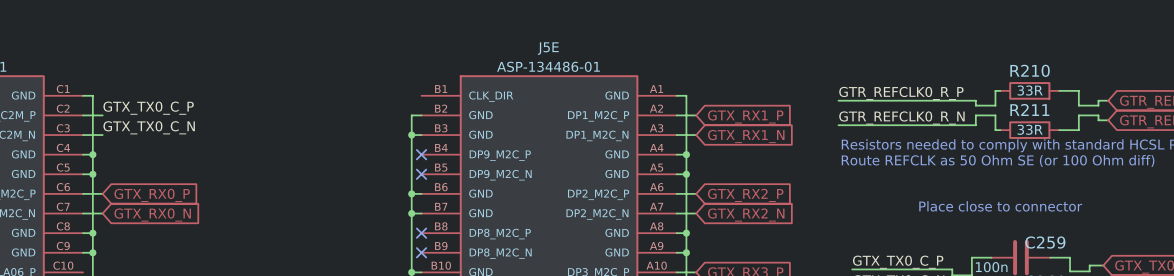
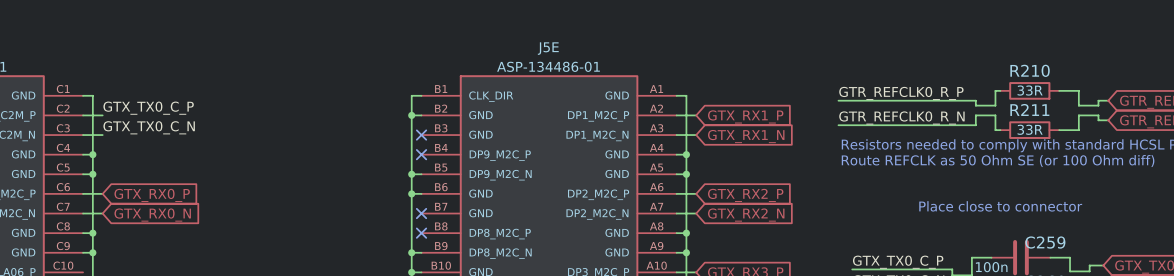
wire: none -> (421, 95) (411, 95) (411, 115)
junction: none -> (411, 115)
wire: (411, 135) (421, 135) -> (411, 174) (421, 174)
junction: (411, 135) -> none
no-connect mark: none -> (421, 135)
junction: none -> (411, 174)
no-connect mark: (421, 174) -> none
wire: (411, 213) (421, 213) -> (411, 252) (421, 252)
junction: (411, 213) -> none
no-connect mark: none -> (421, 213)
junction: none -> (411, 252)
no-connect mark: (421, 252) -> none

